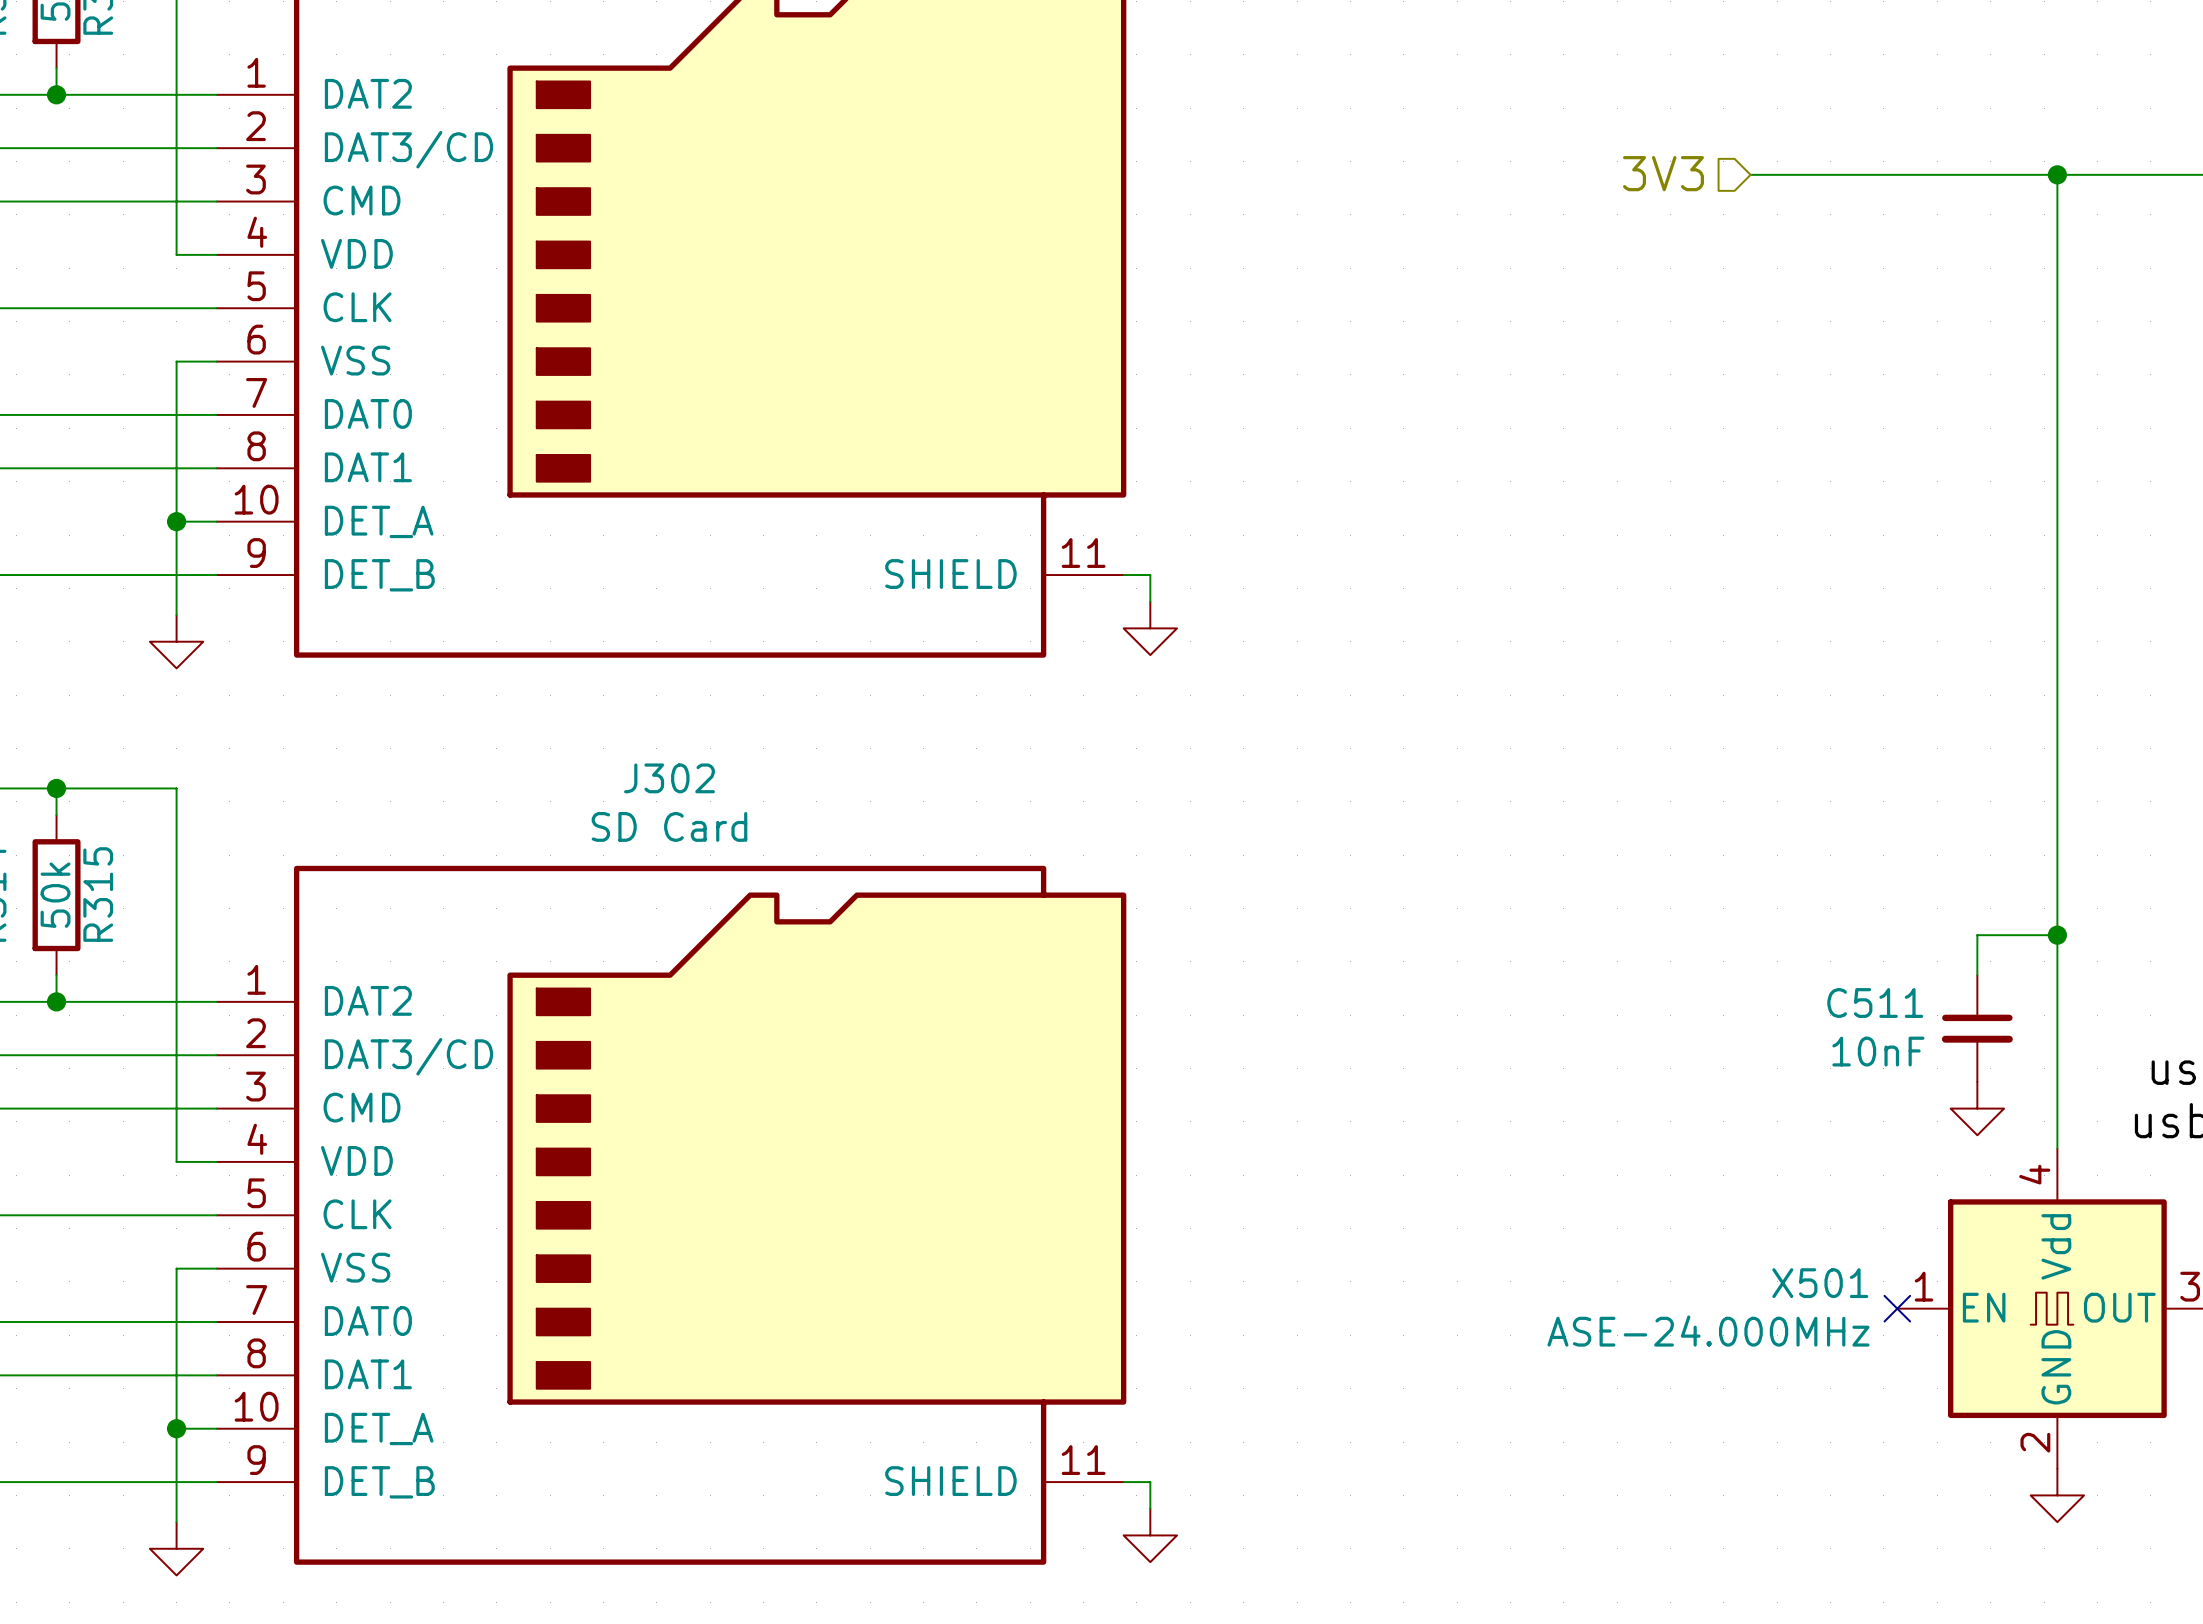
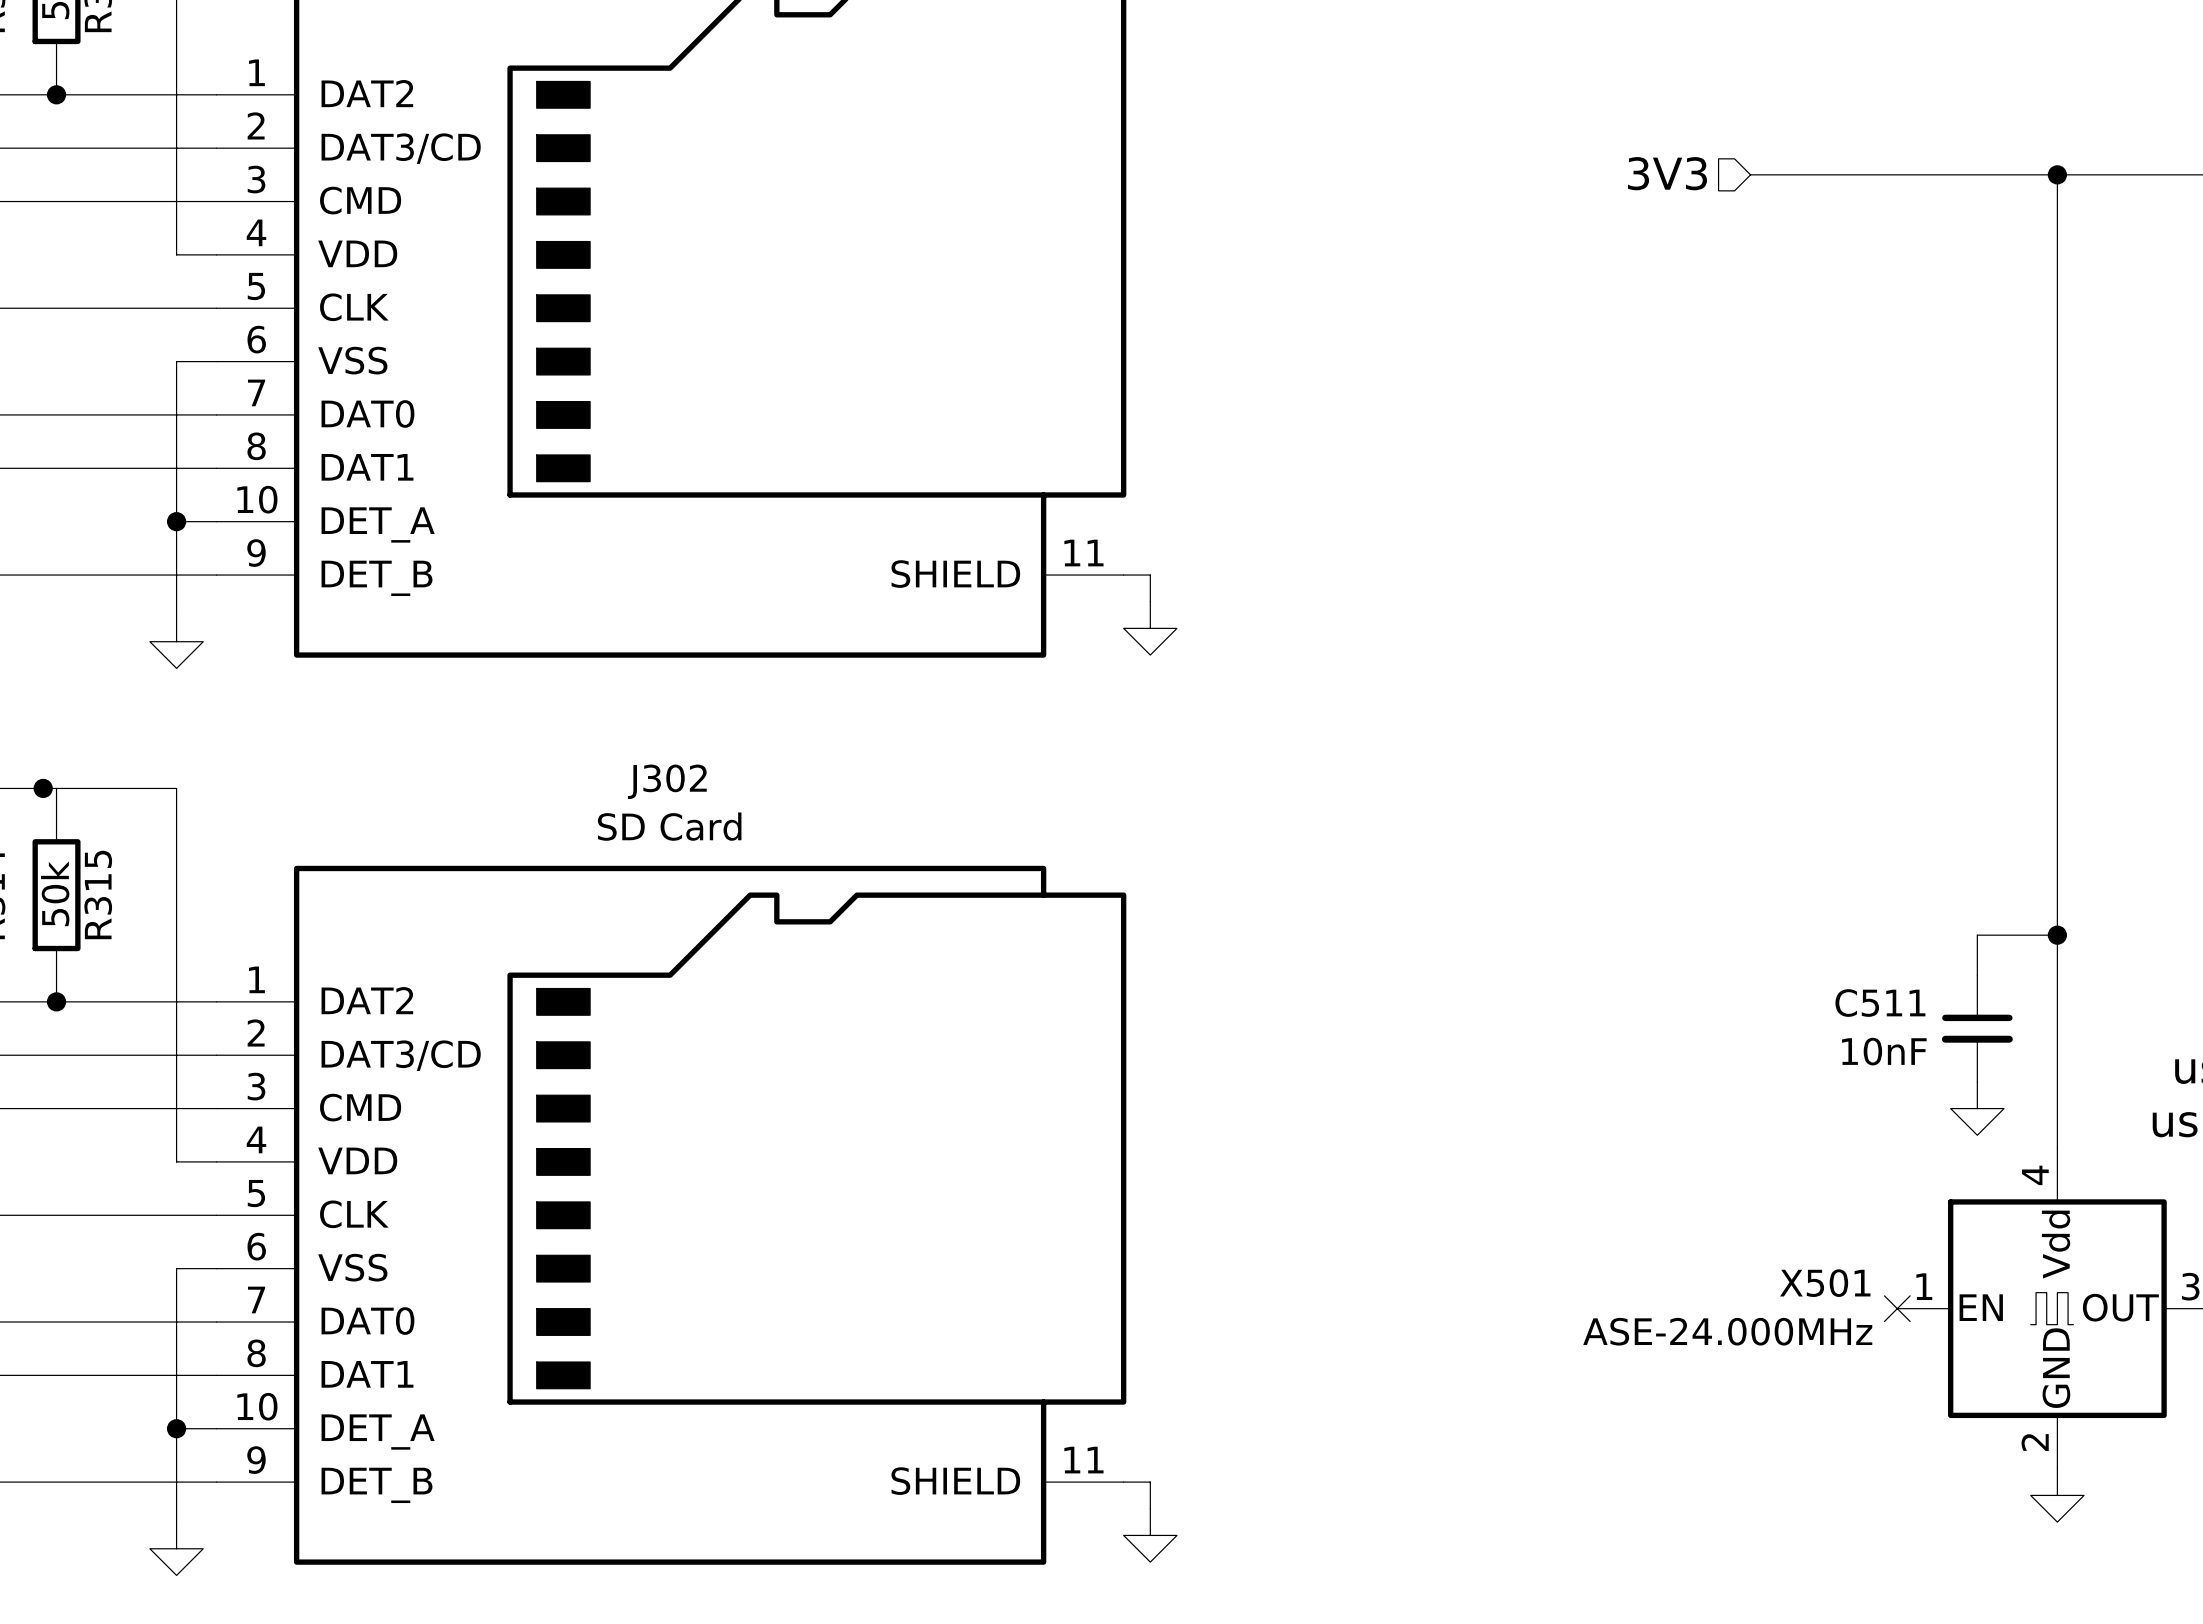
junction position: (56, 788) -> (43, 788)

